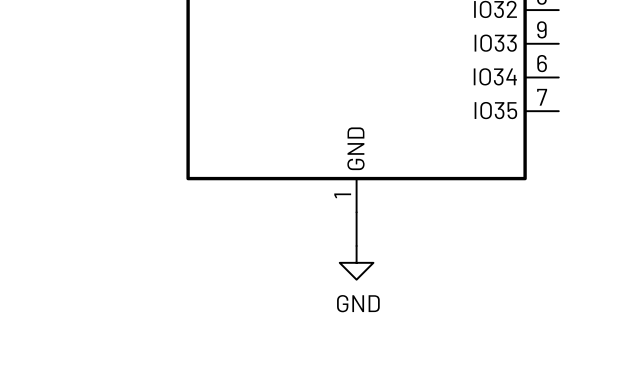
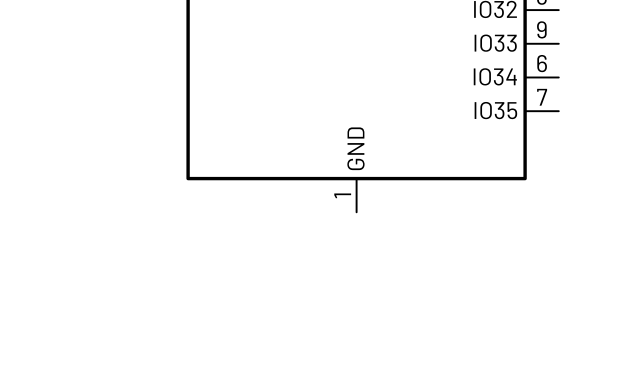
wire: (356, 212) (356, 245) -> none
power symbol: GND (356, 262) -> none

